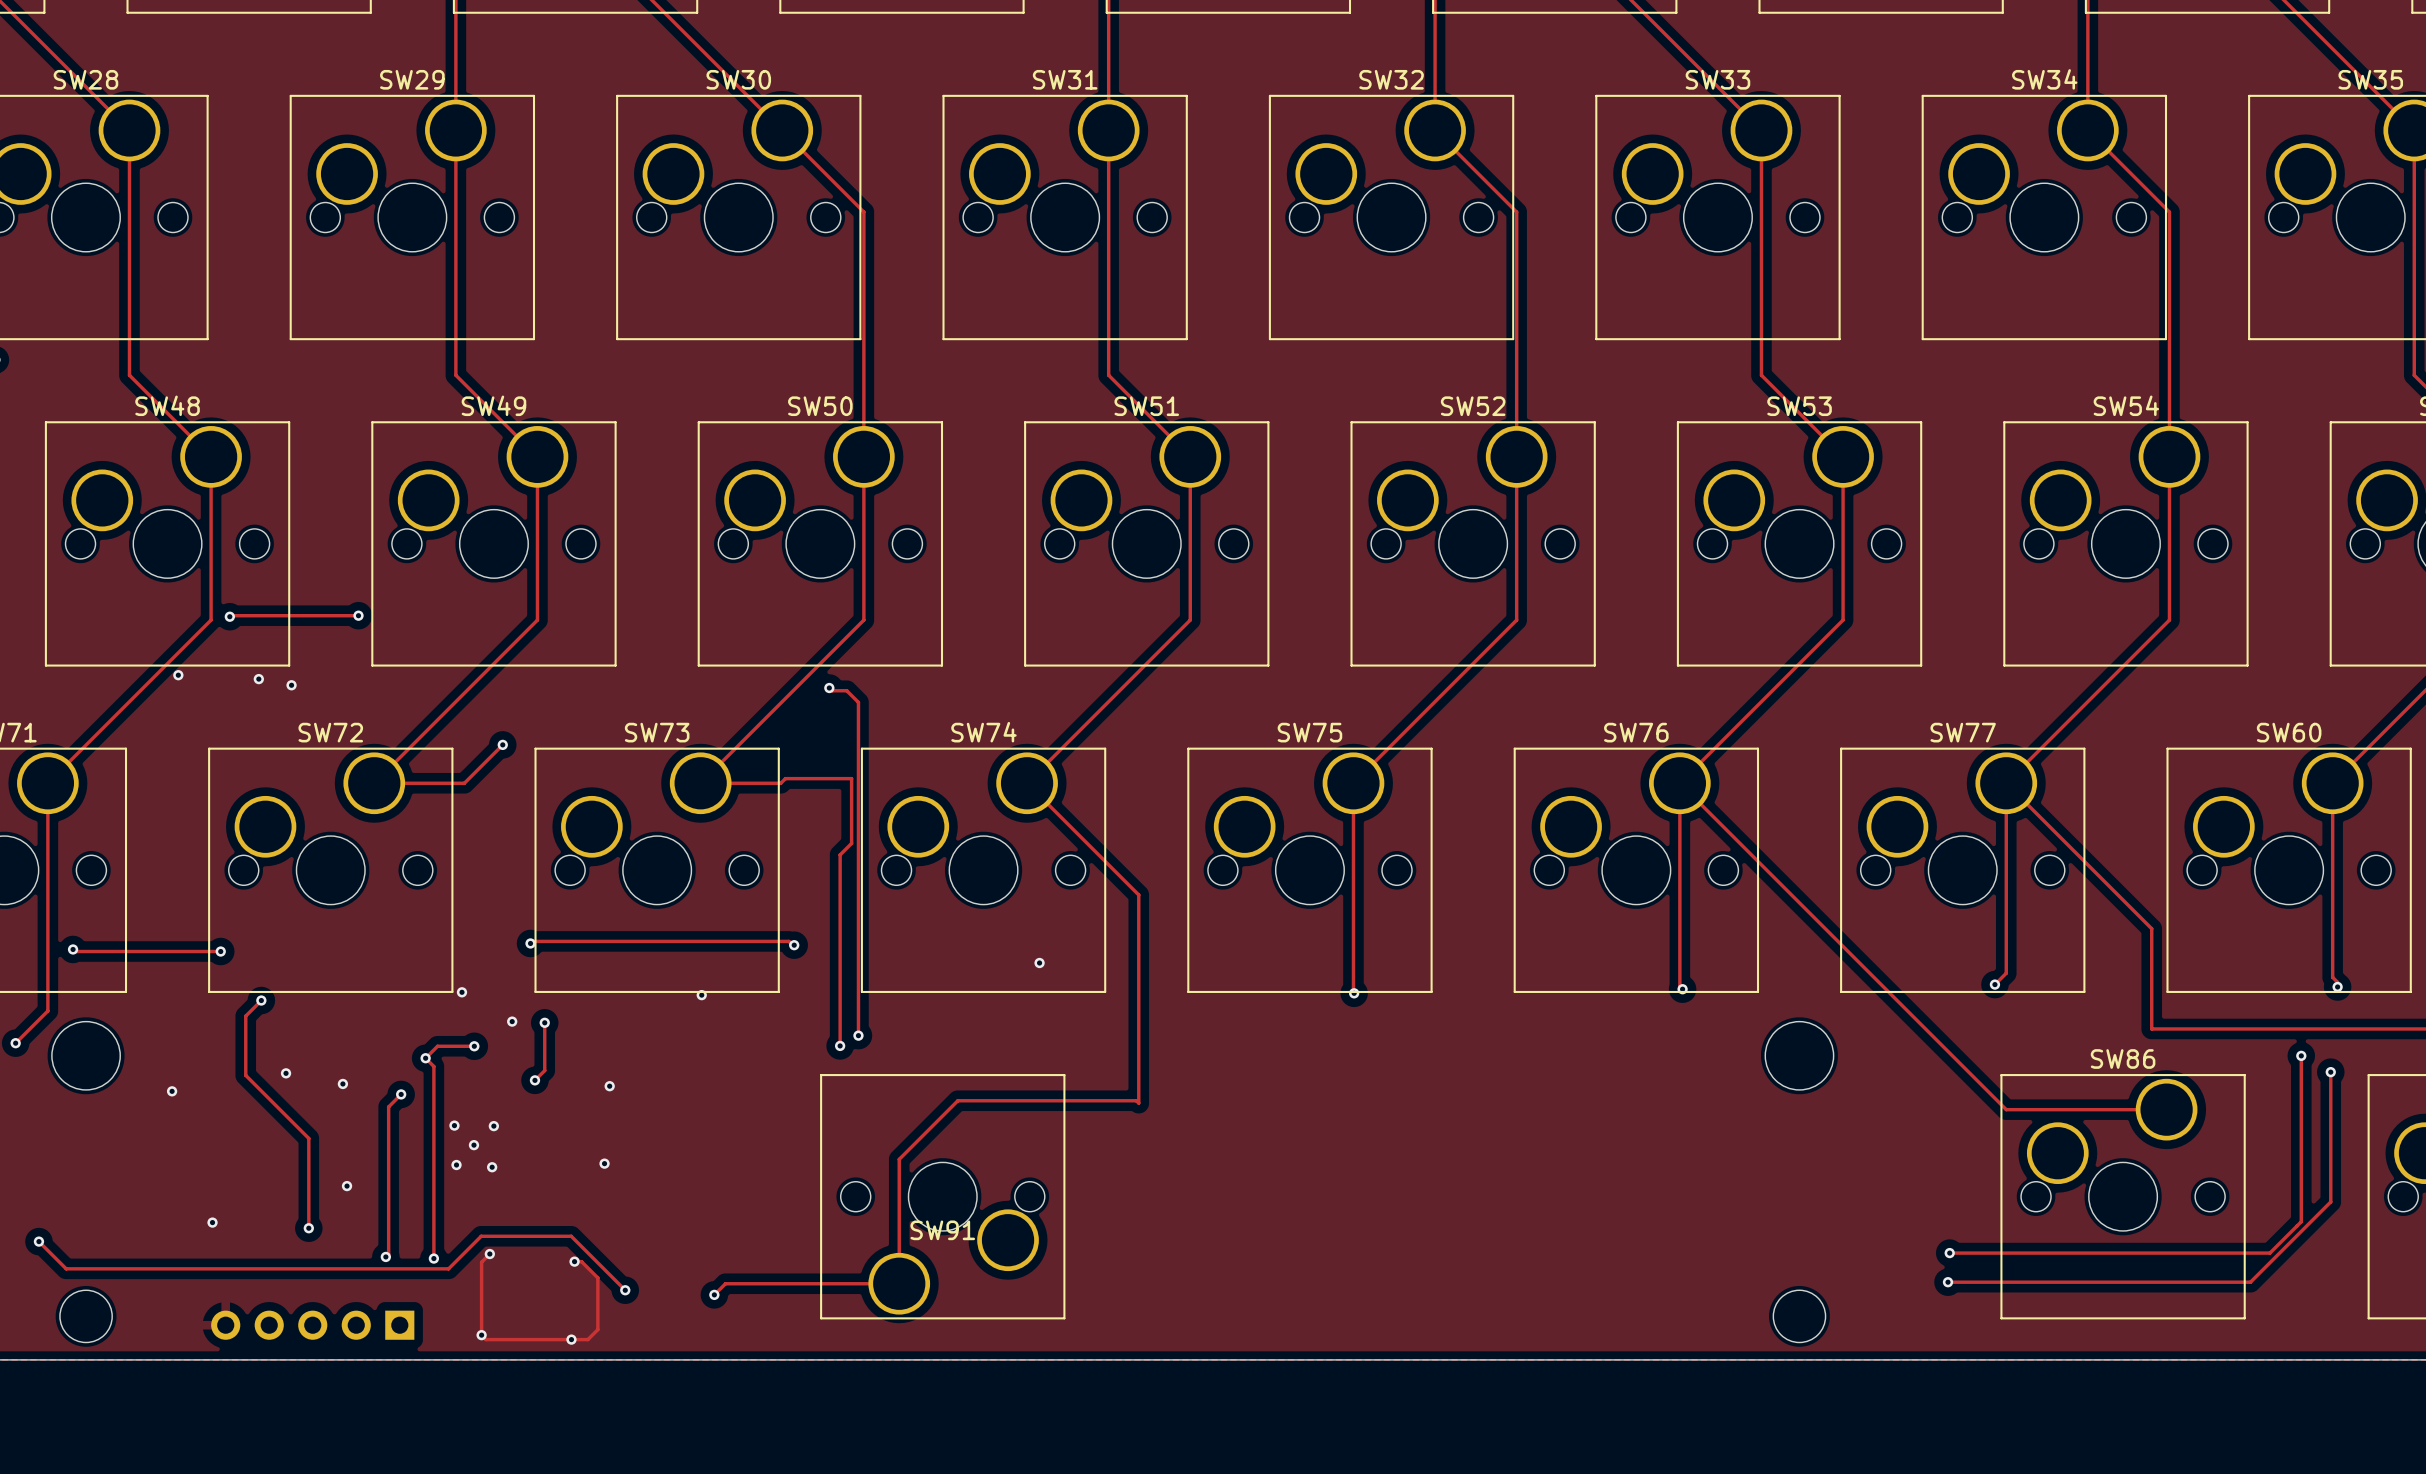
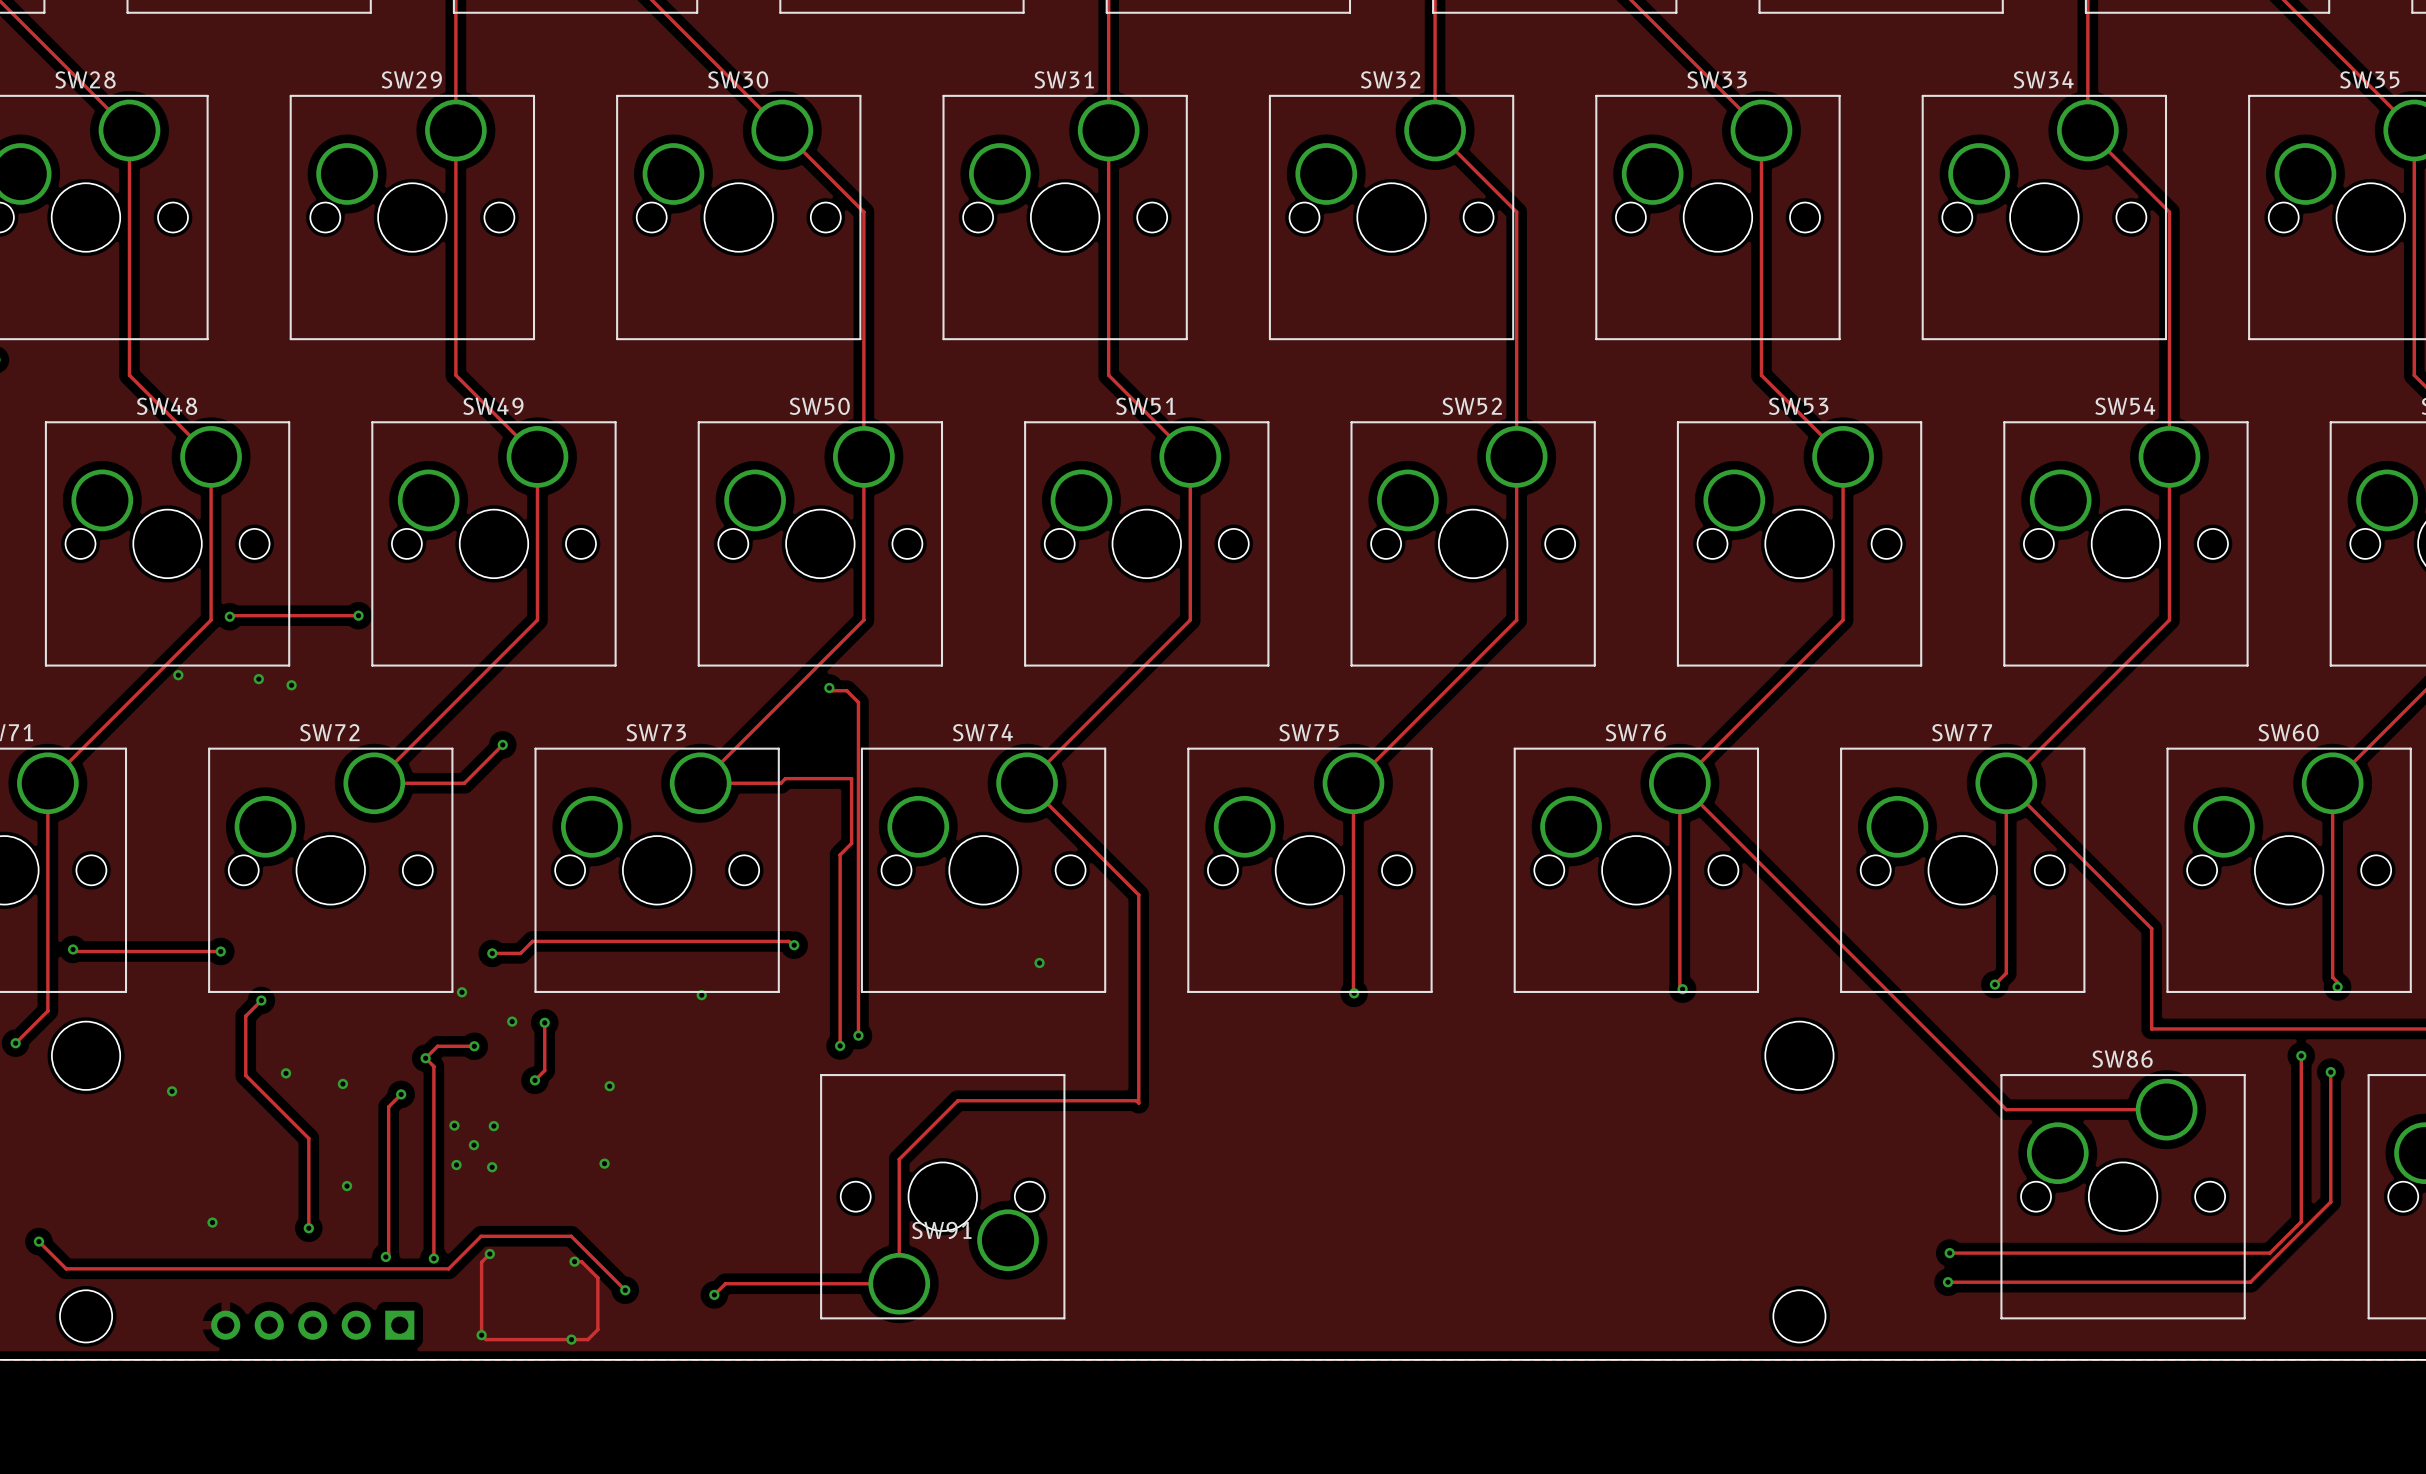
track: none -> (530, 943) (520, 953) (492, 953)
via position: (530, 943) -> (492, 953)

